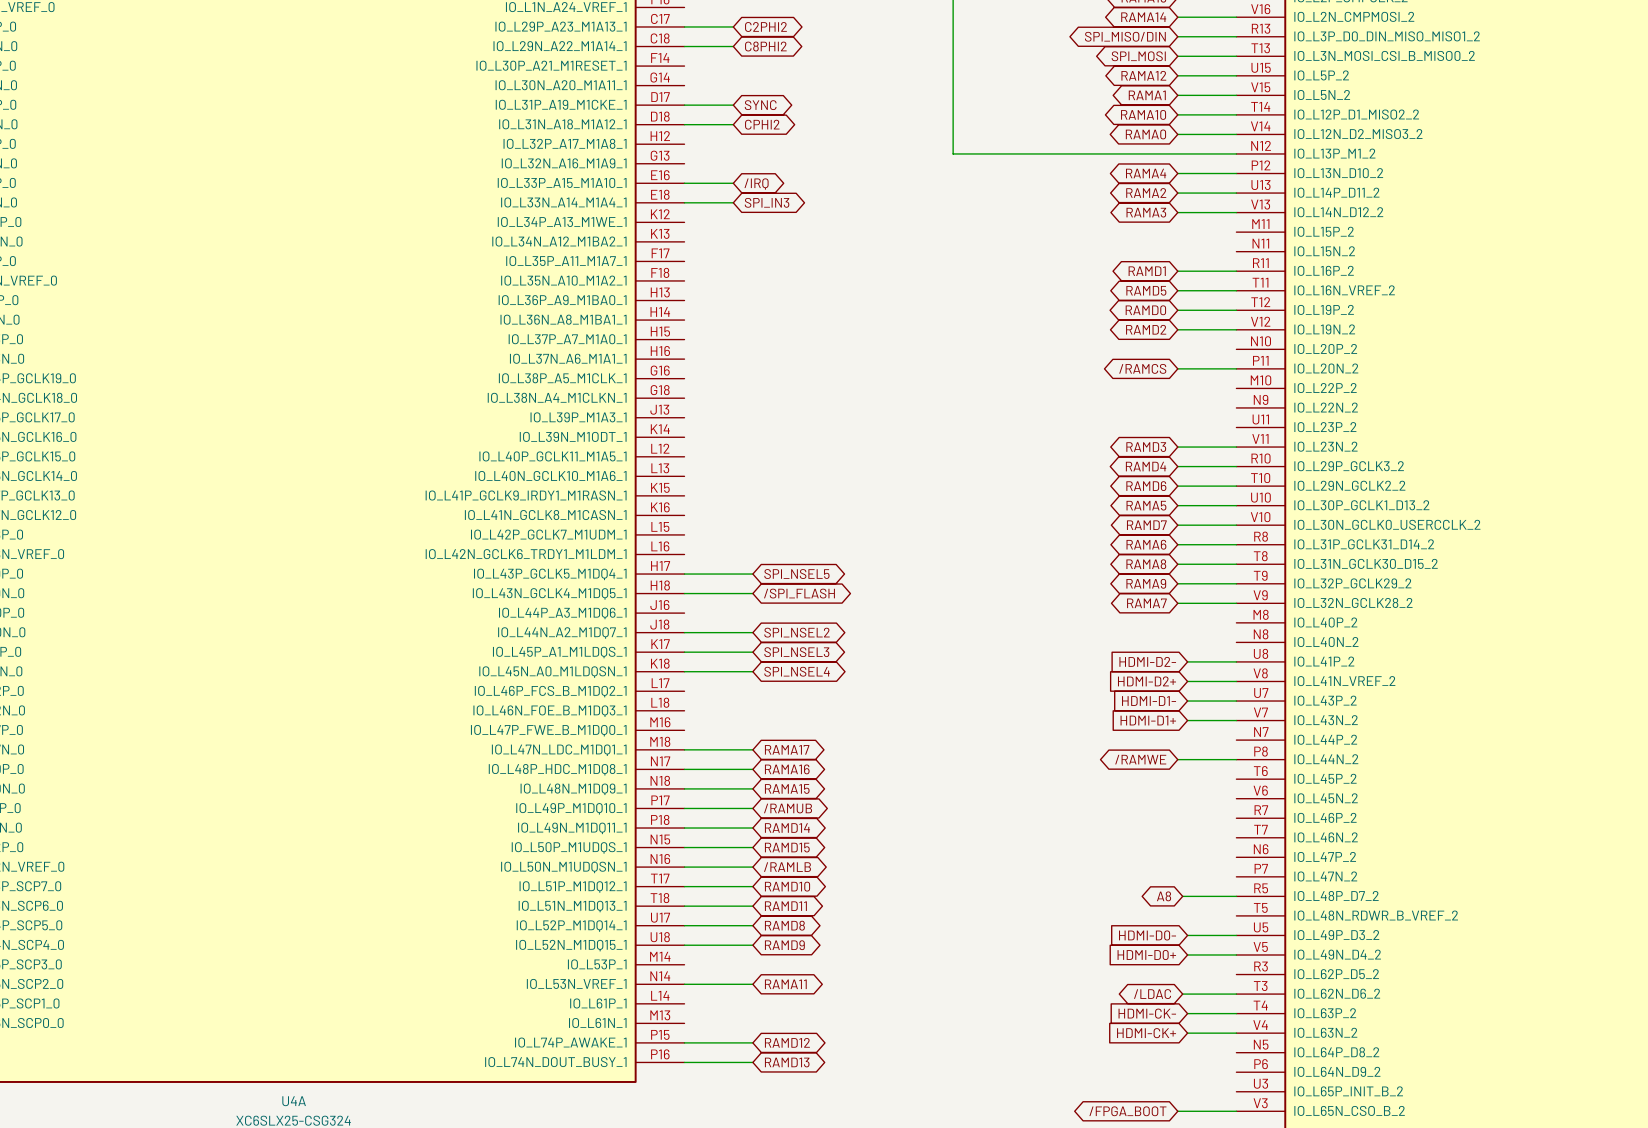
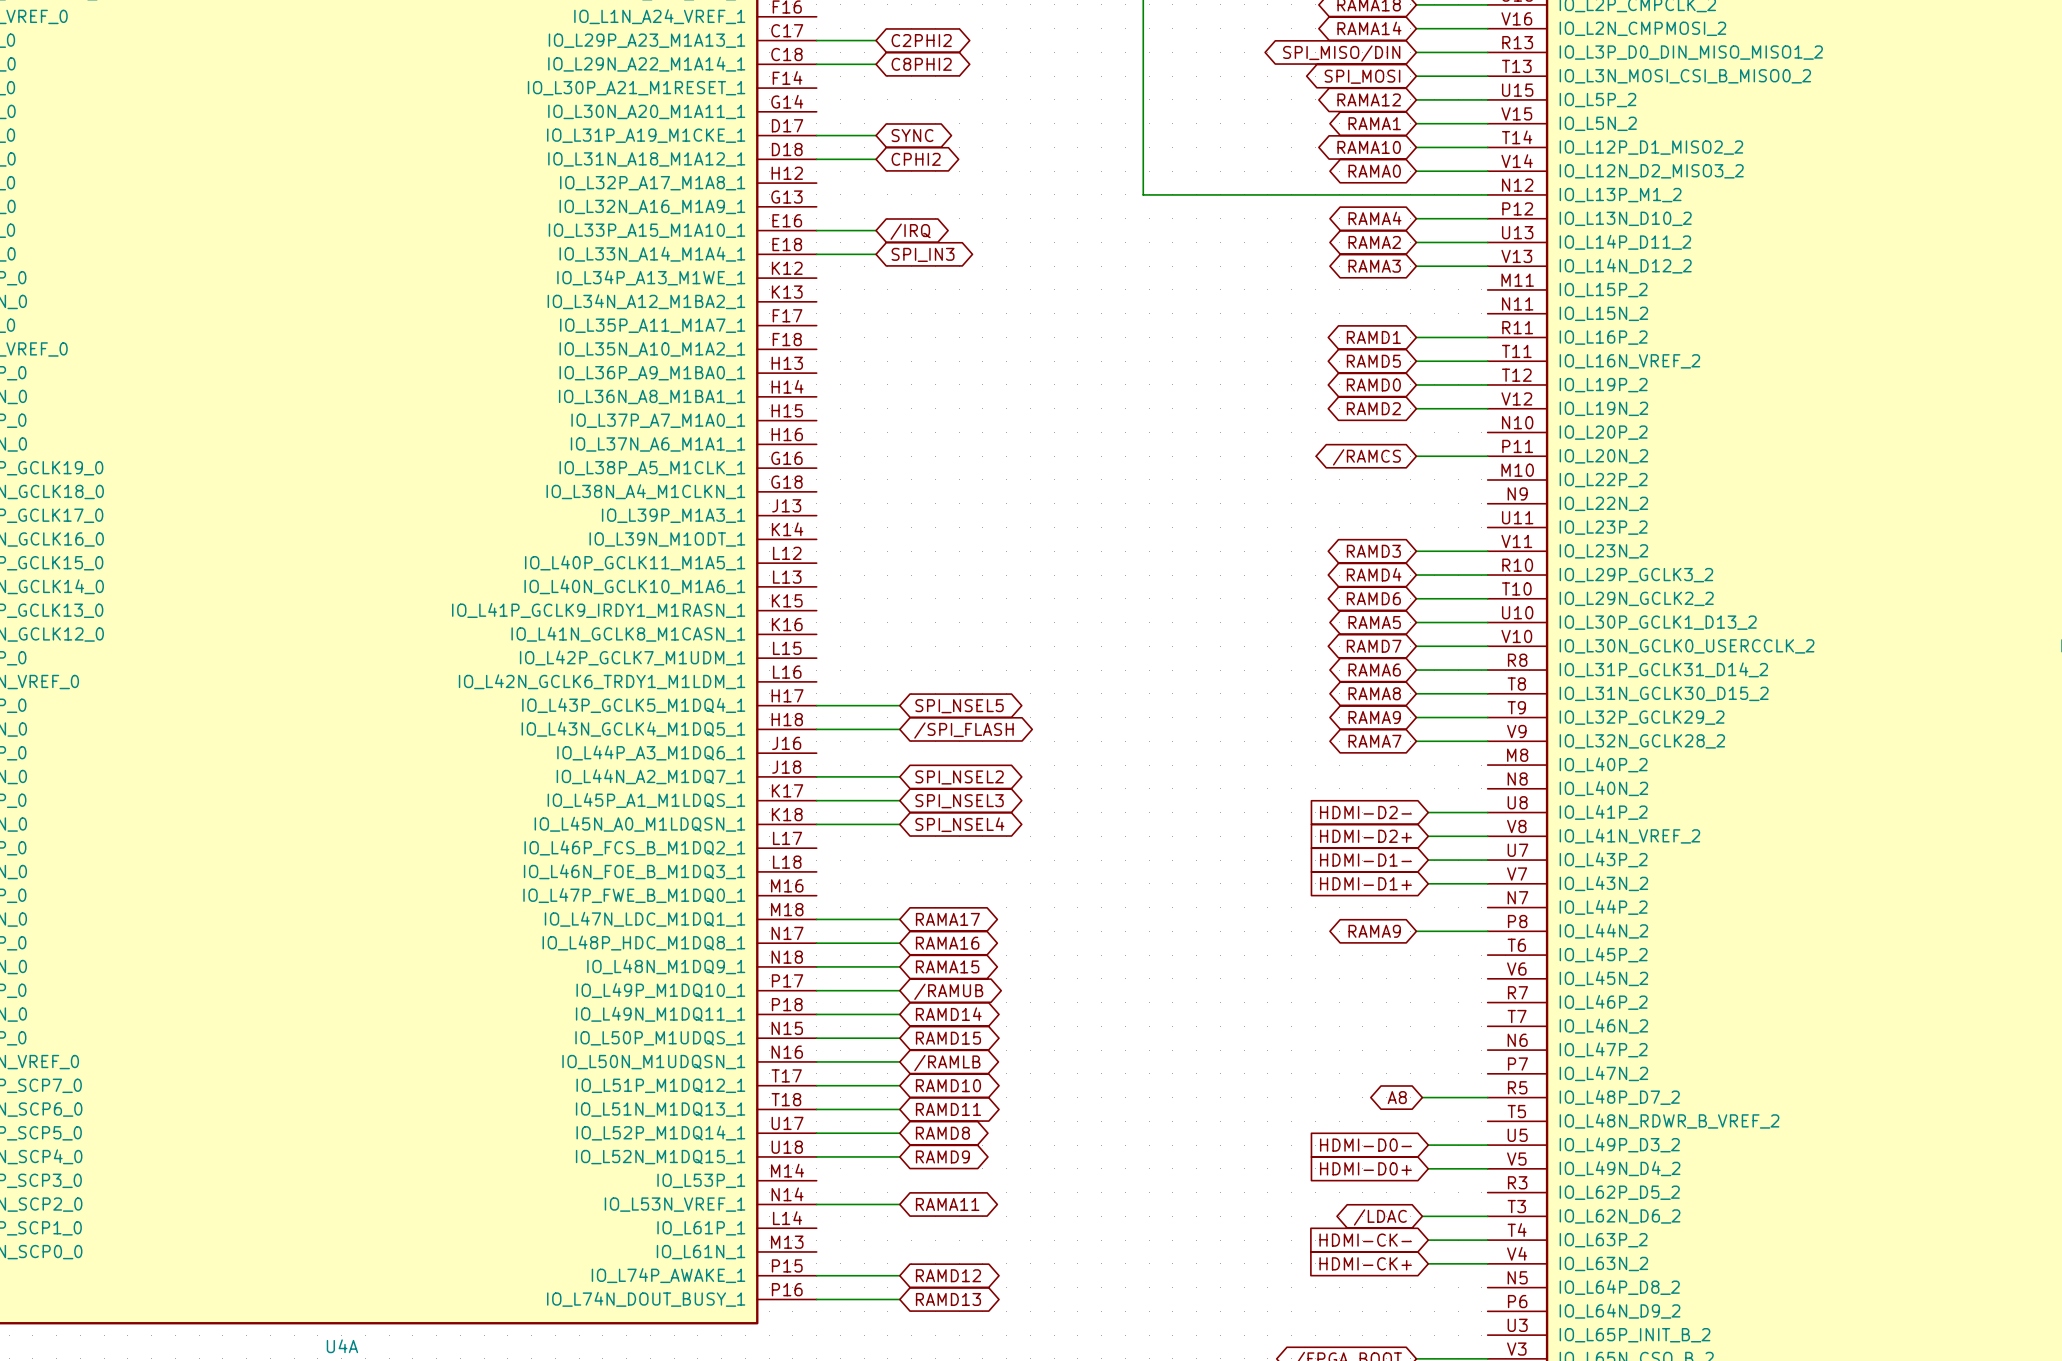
global label: /RAMWE (1140, 759) -> RAMA9 (1374, 931)

